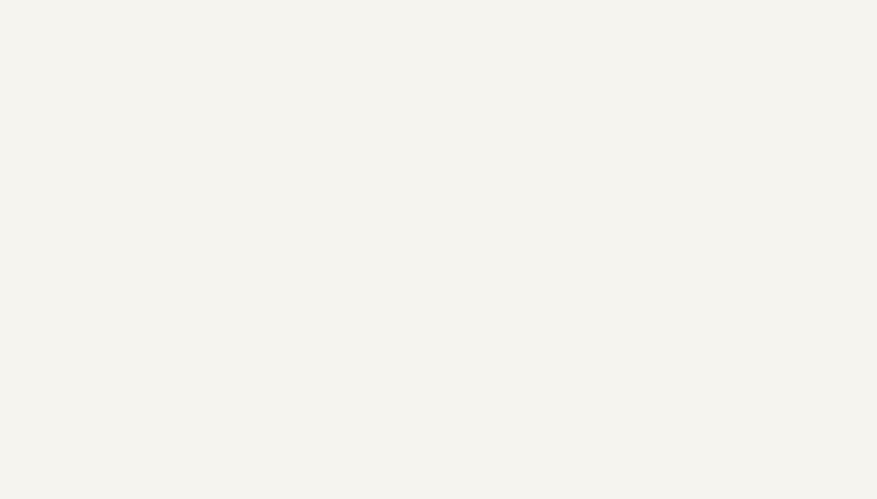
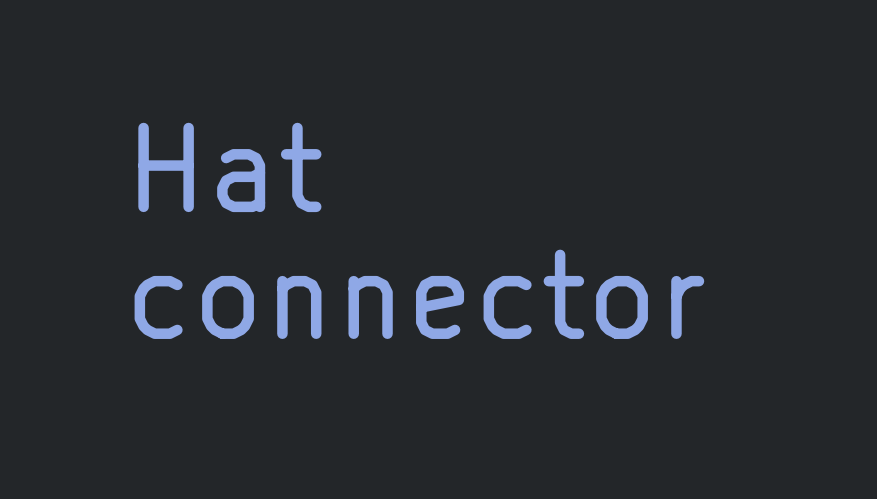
text: none -> Hat (229, 167)
text: none -> connector (419, 294)

